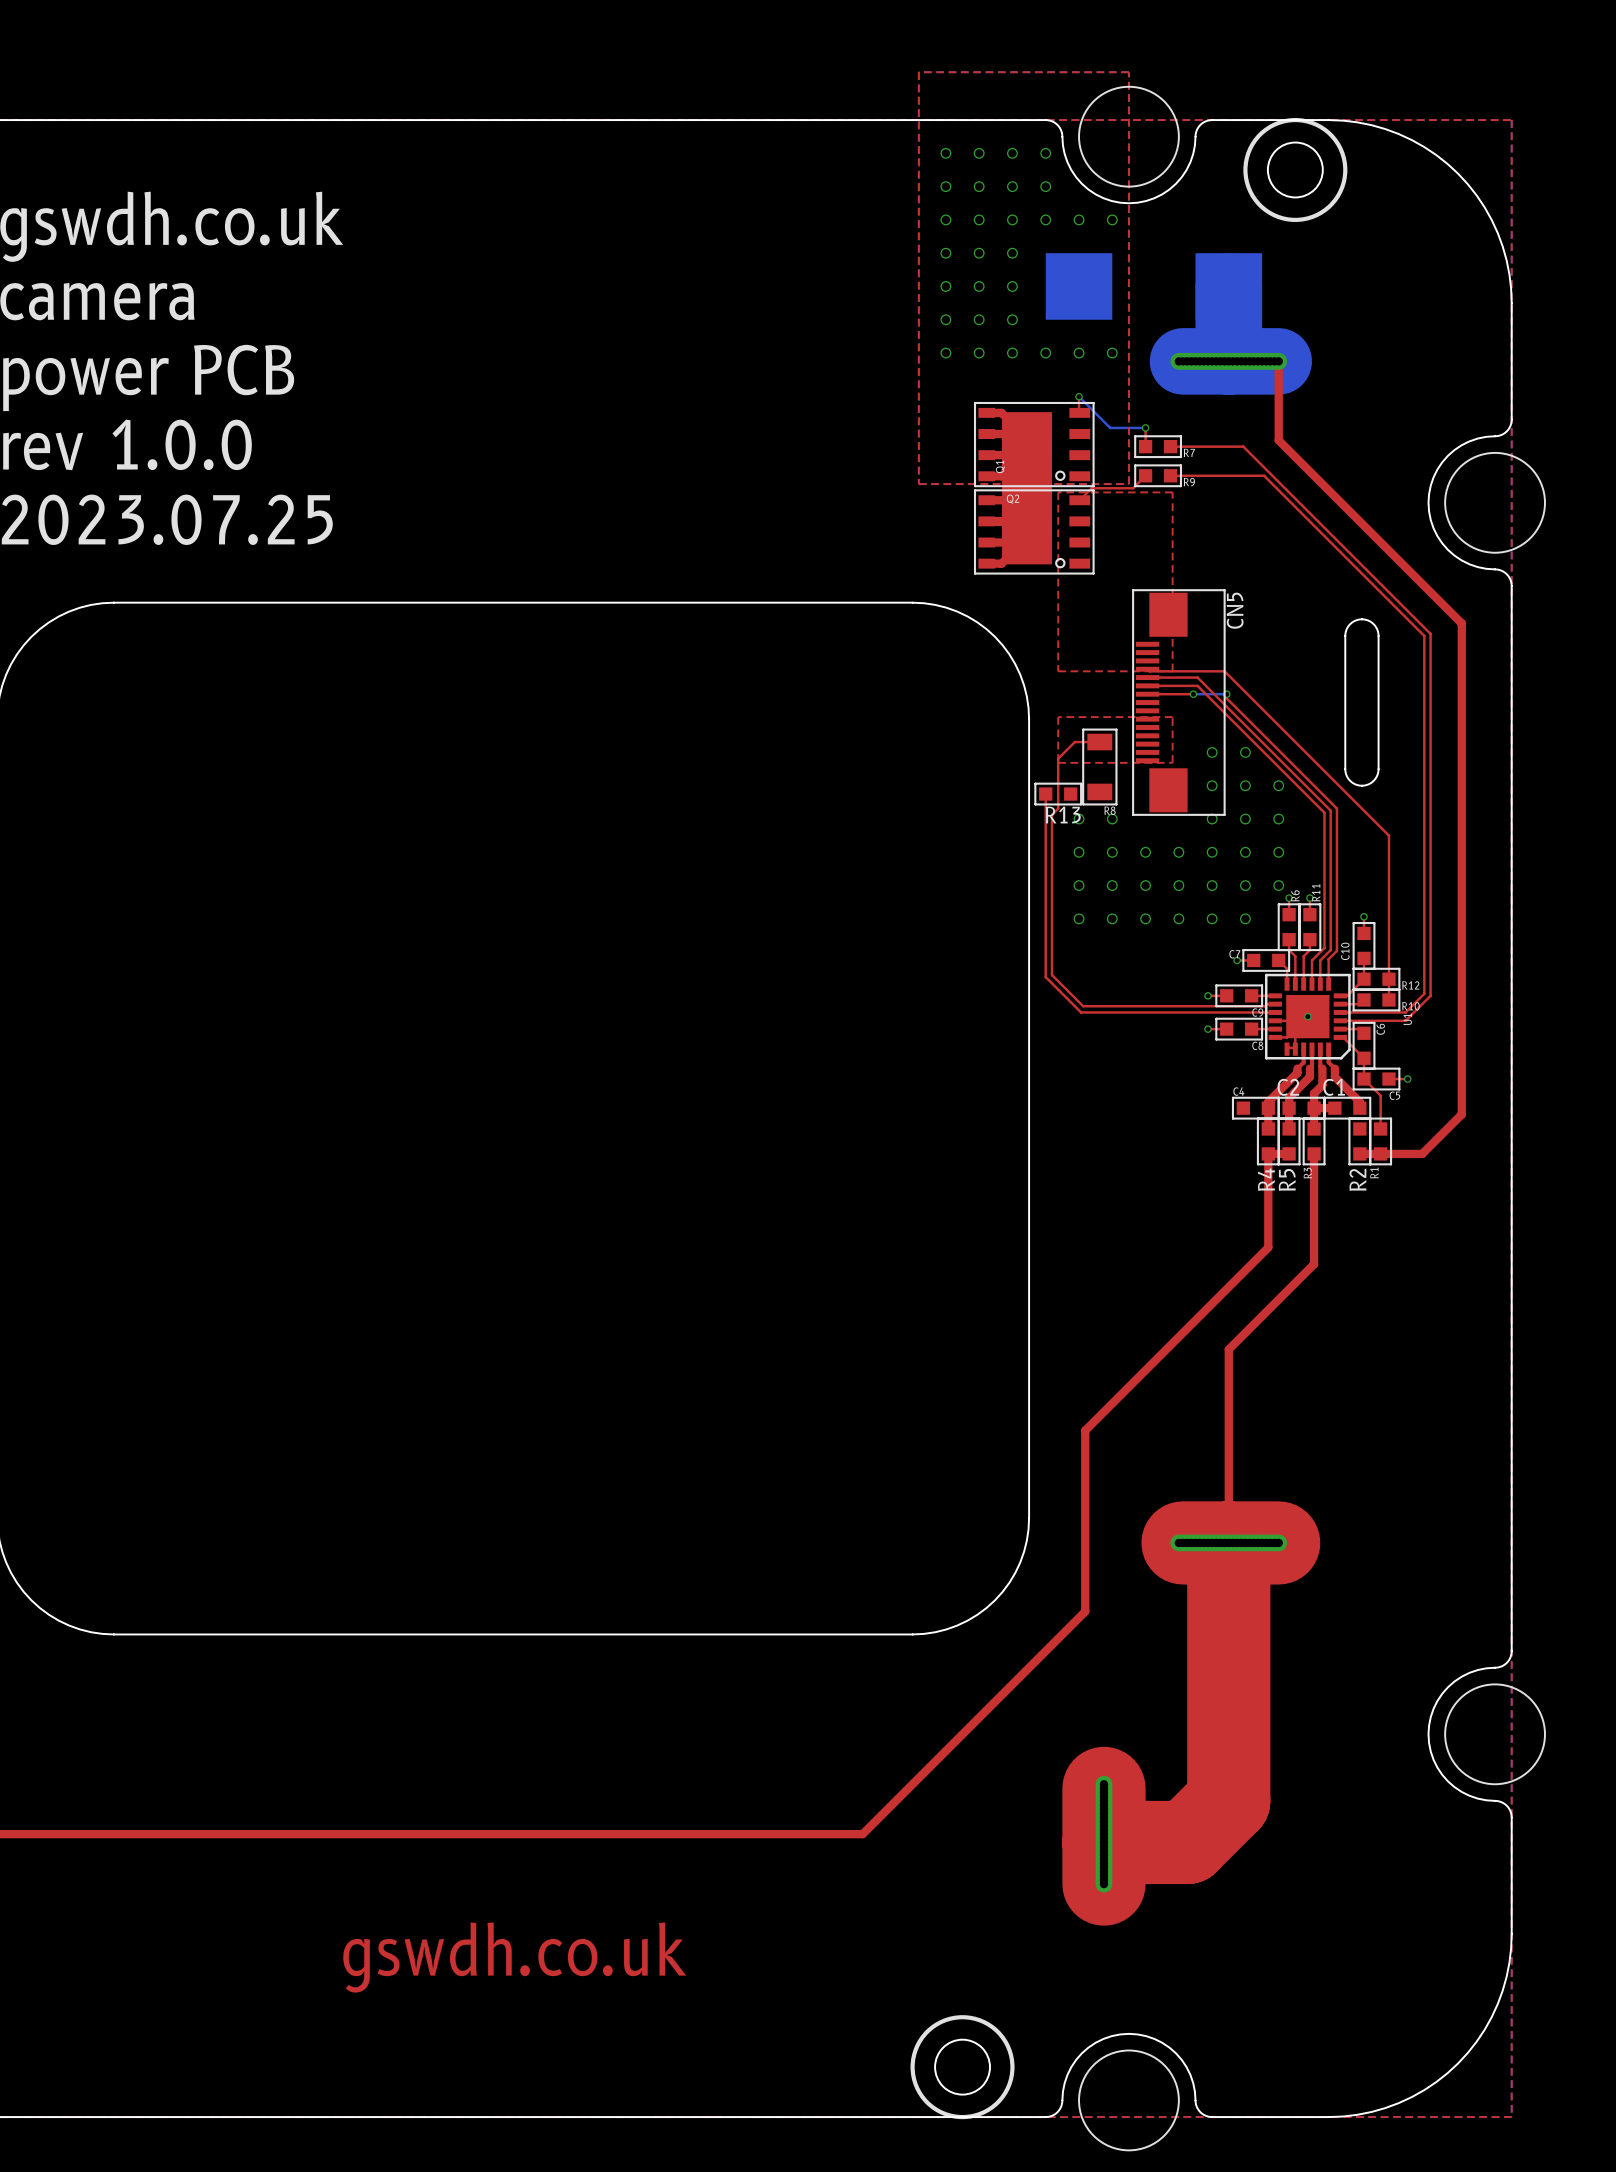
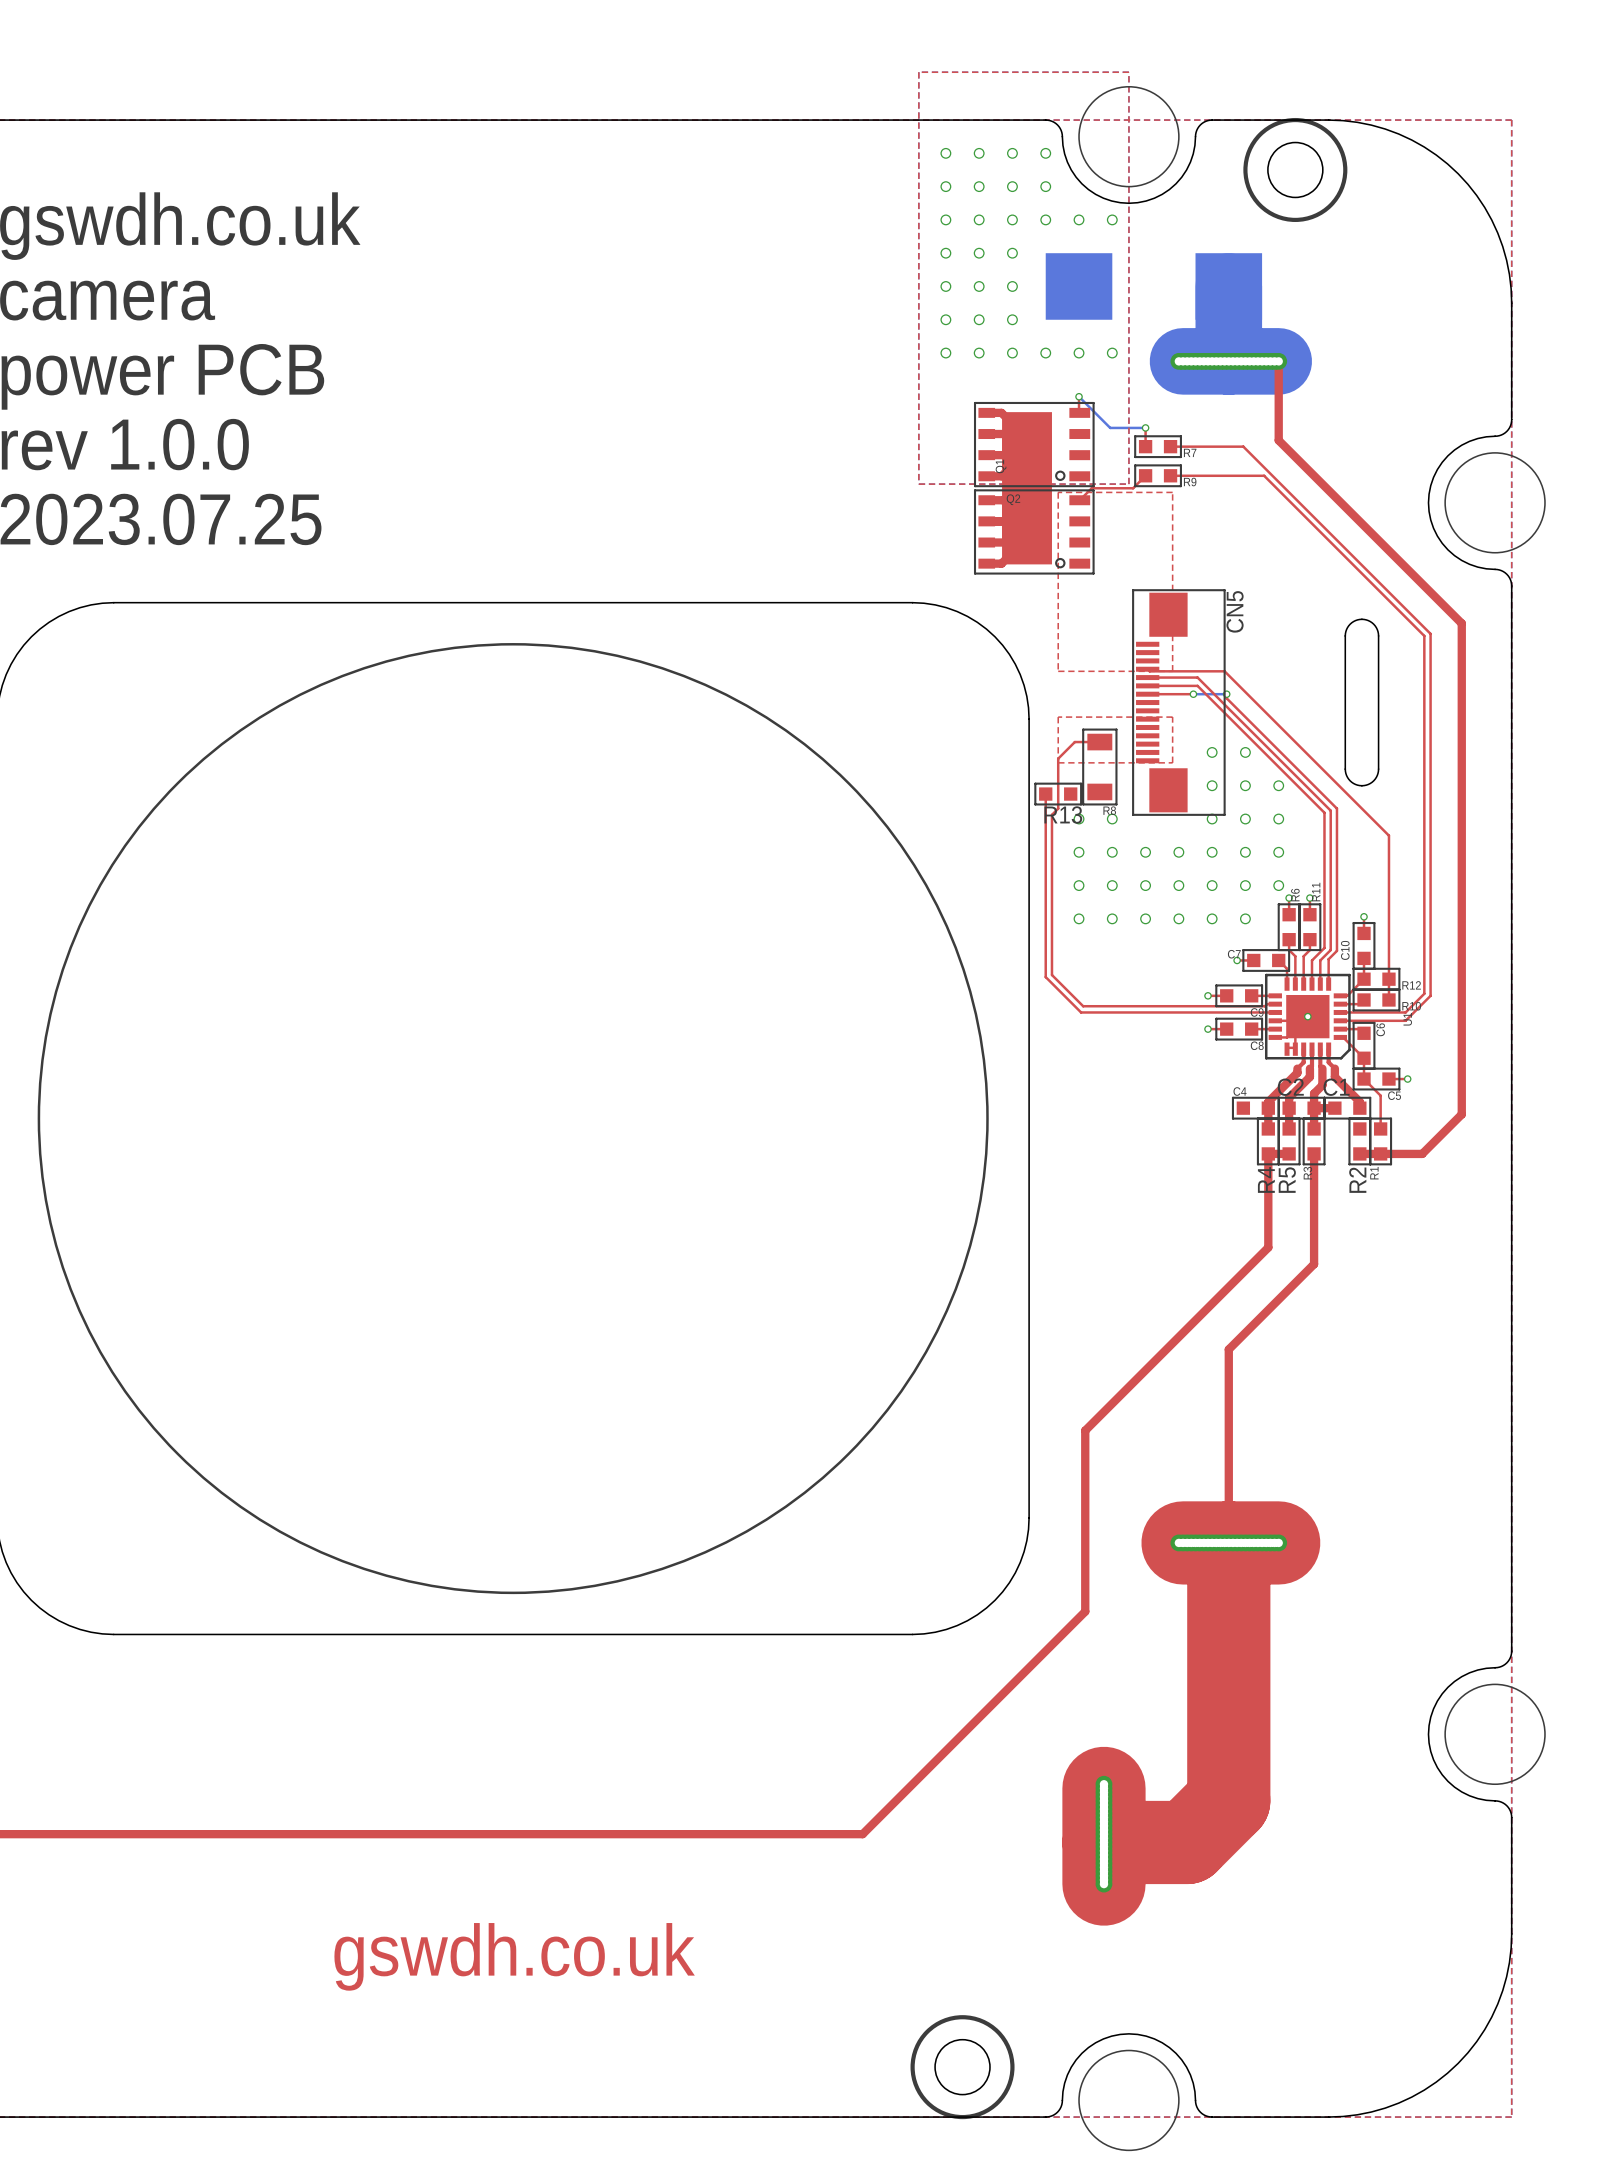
drawing: none -> [37, 643, 989, 1595]

